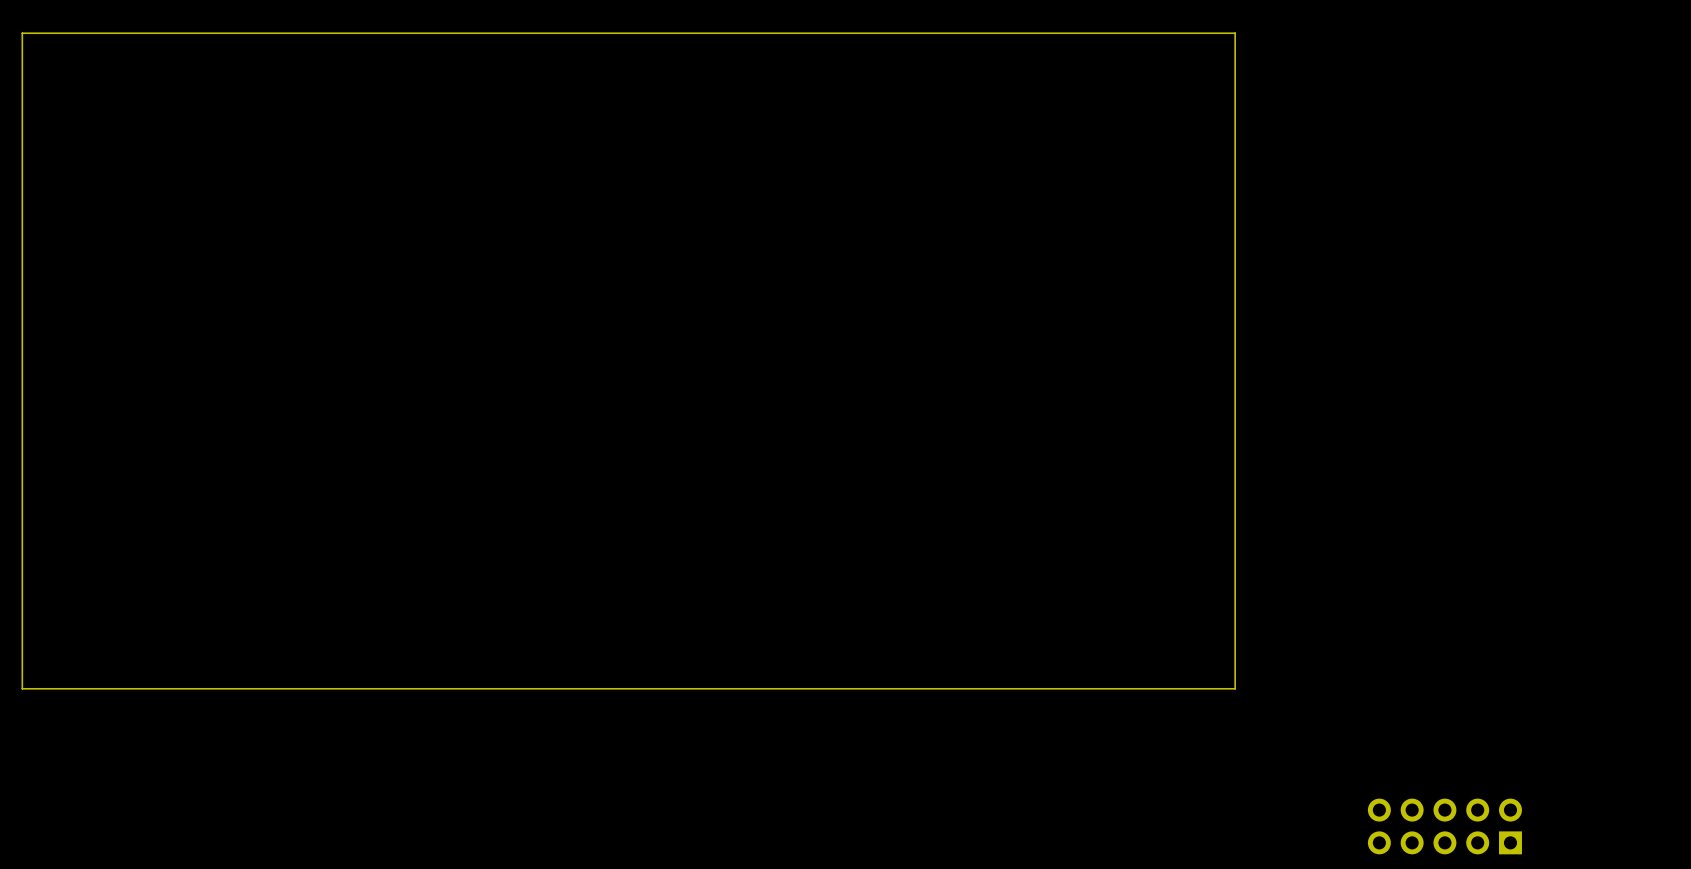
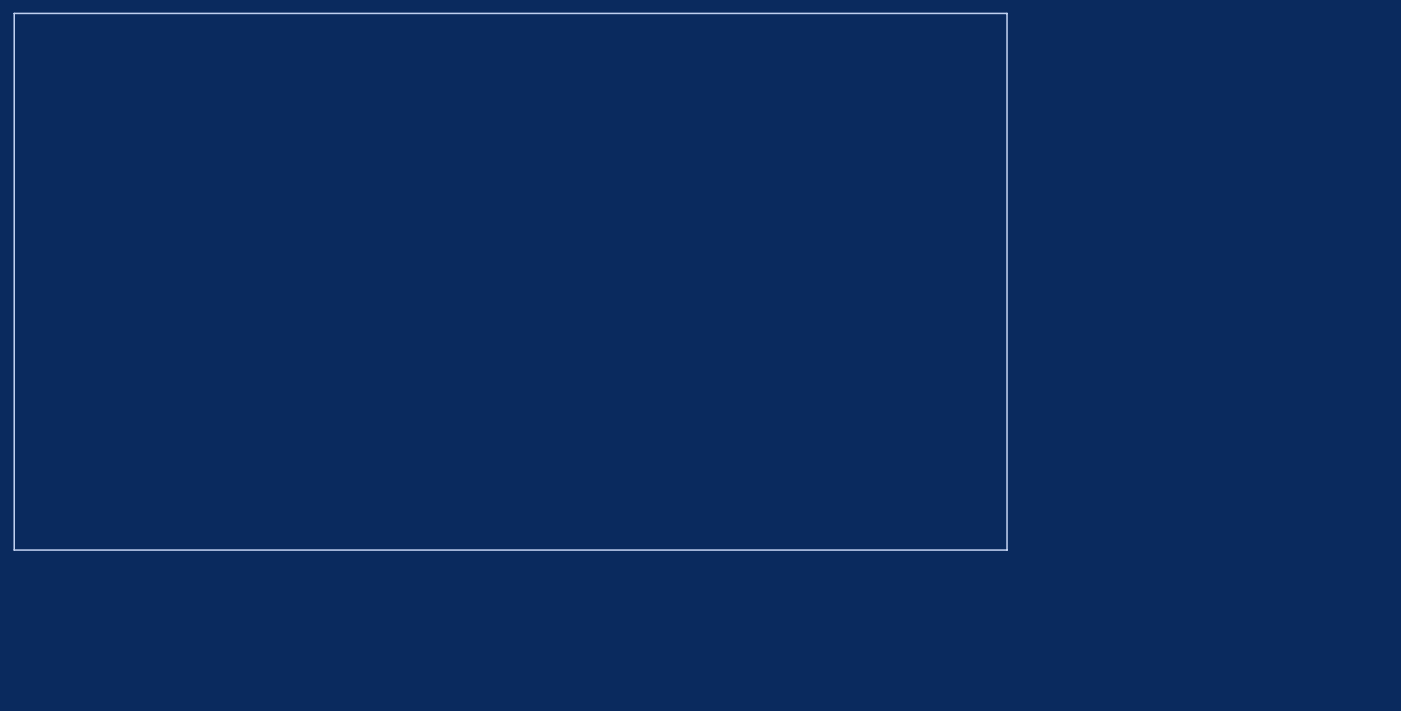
part: (1444, 826) -> none

